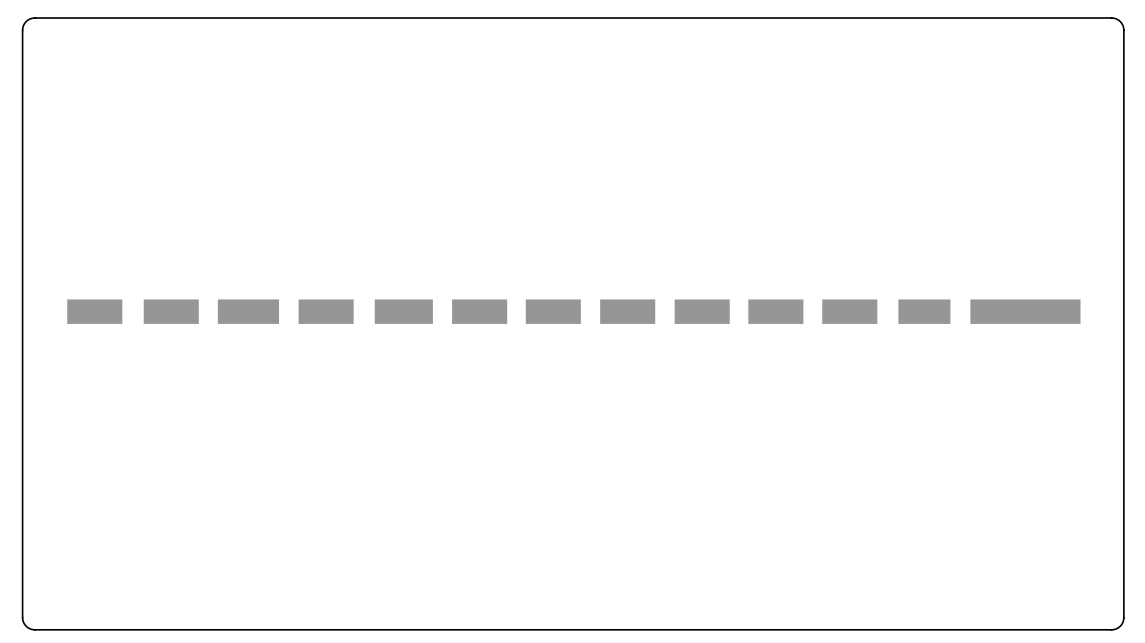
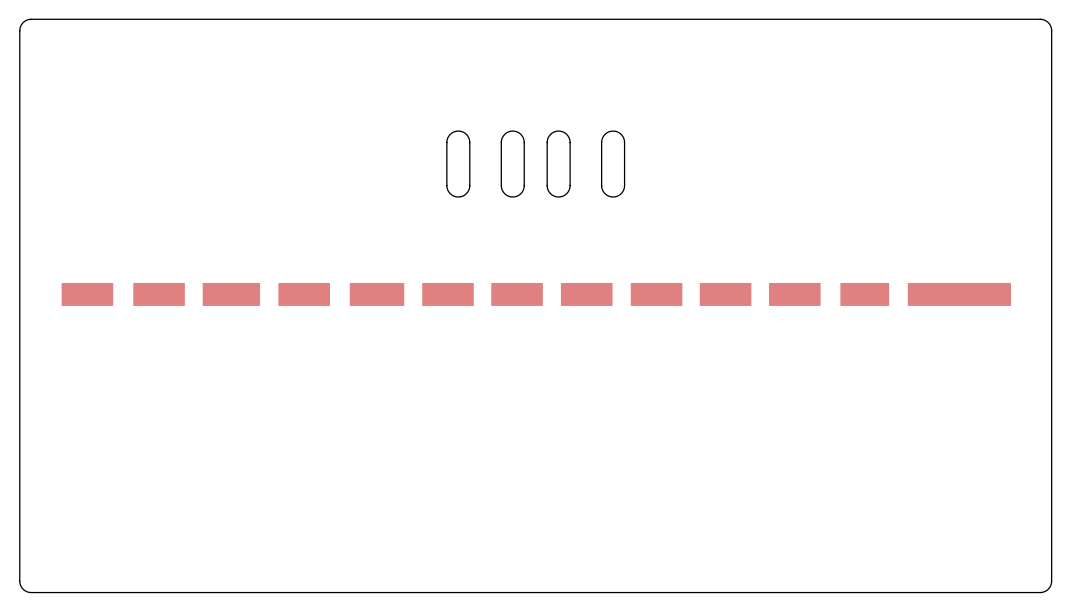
board edge: none -> (446, 142) (447, 188) (452, 195) (461, 196) (467, 192) (469, 187) (469, 139) (464, 132) (456, 131) (449, 135) (446, 142)
board edge: none -> (501, 142) (501, 188) (507, 195) (515, 196) (521, 192) (524, 187) (523, 139) (518, 132) (511, 131) (503, 135) (501, 142)
board edge: none -> (547, 142) (547, 188) (552, 195) (561, 196) (567, 192) (570, 187) (569, 139) (564, 132) (557, 131) (549, 135) (547, 142)
board edge: none -> (601, 142) (602, 188) (607, 195) (616, 196) (622, 192) (624, 187) (624, 139) (618, 132) (611, 131) (604, 135) (601, 142)

